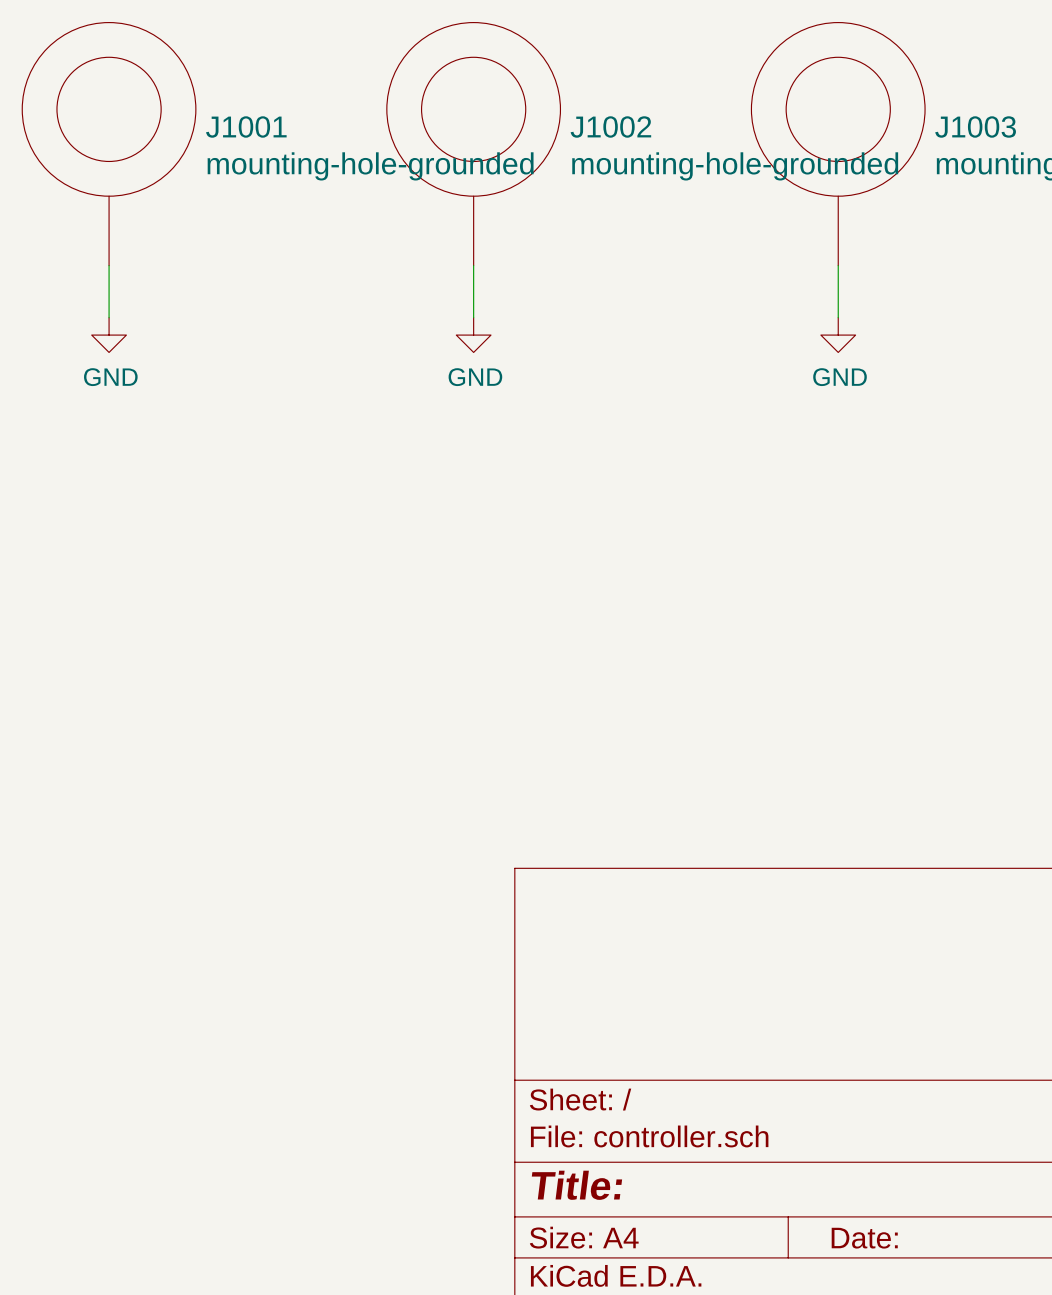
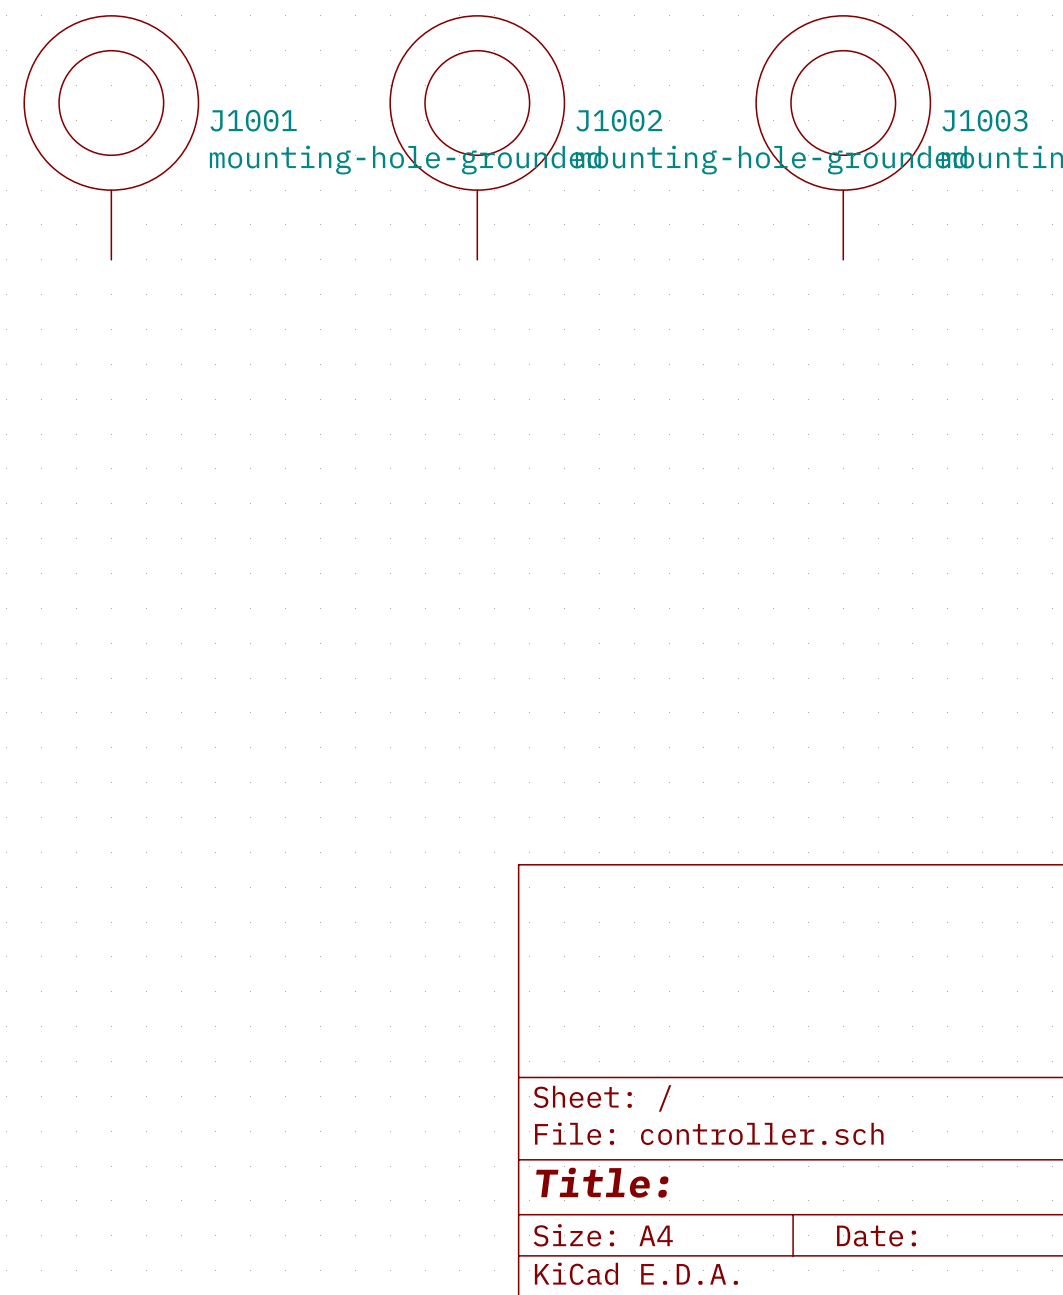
wire: (109, 265) (109, 317) -> none
wire: (473, 265) (473, 317) -> none
wire: (838, 265) (838, 317) -> none
power symbol: GND (109, 335) -> none
power symbol: GND (473, 335) -> none
power symbol: GND (838, 335) -> none

